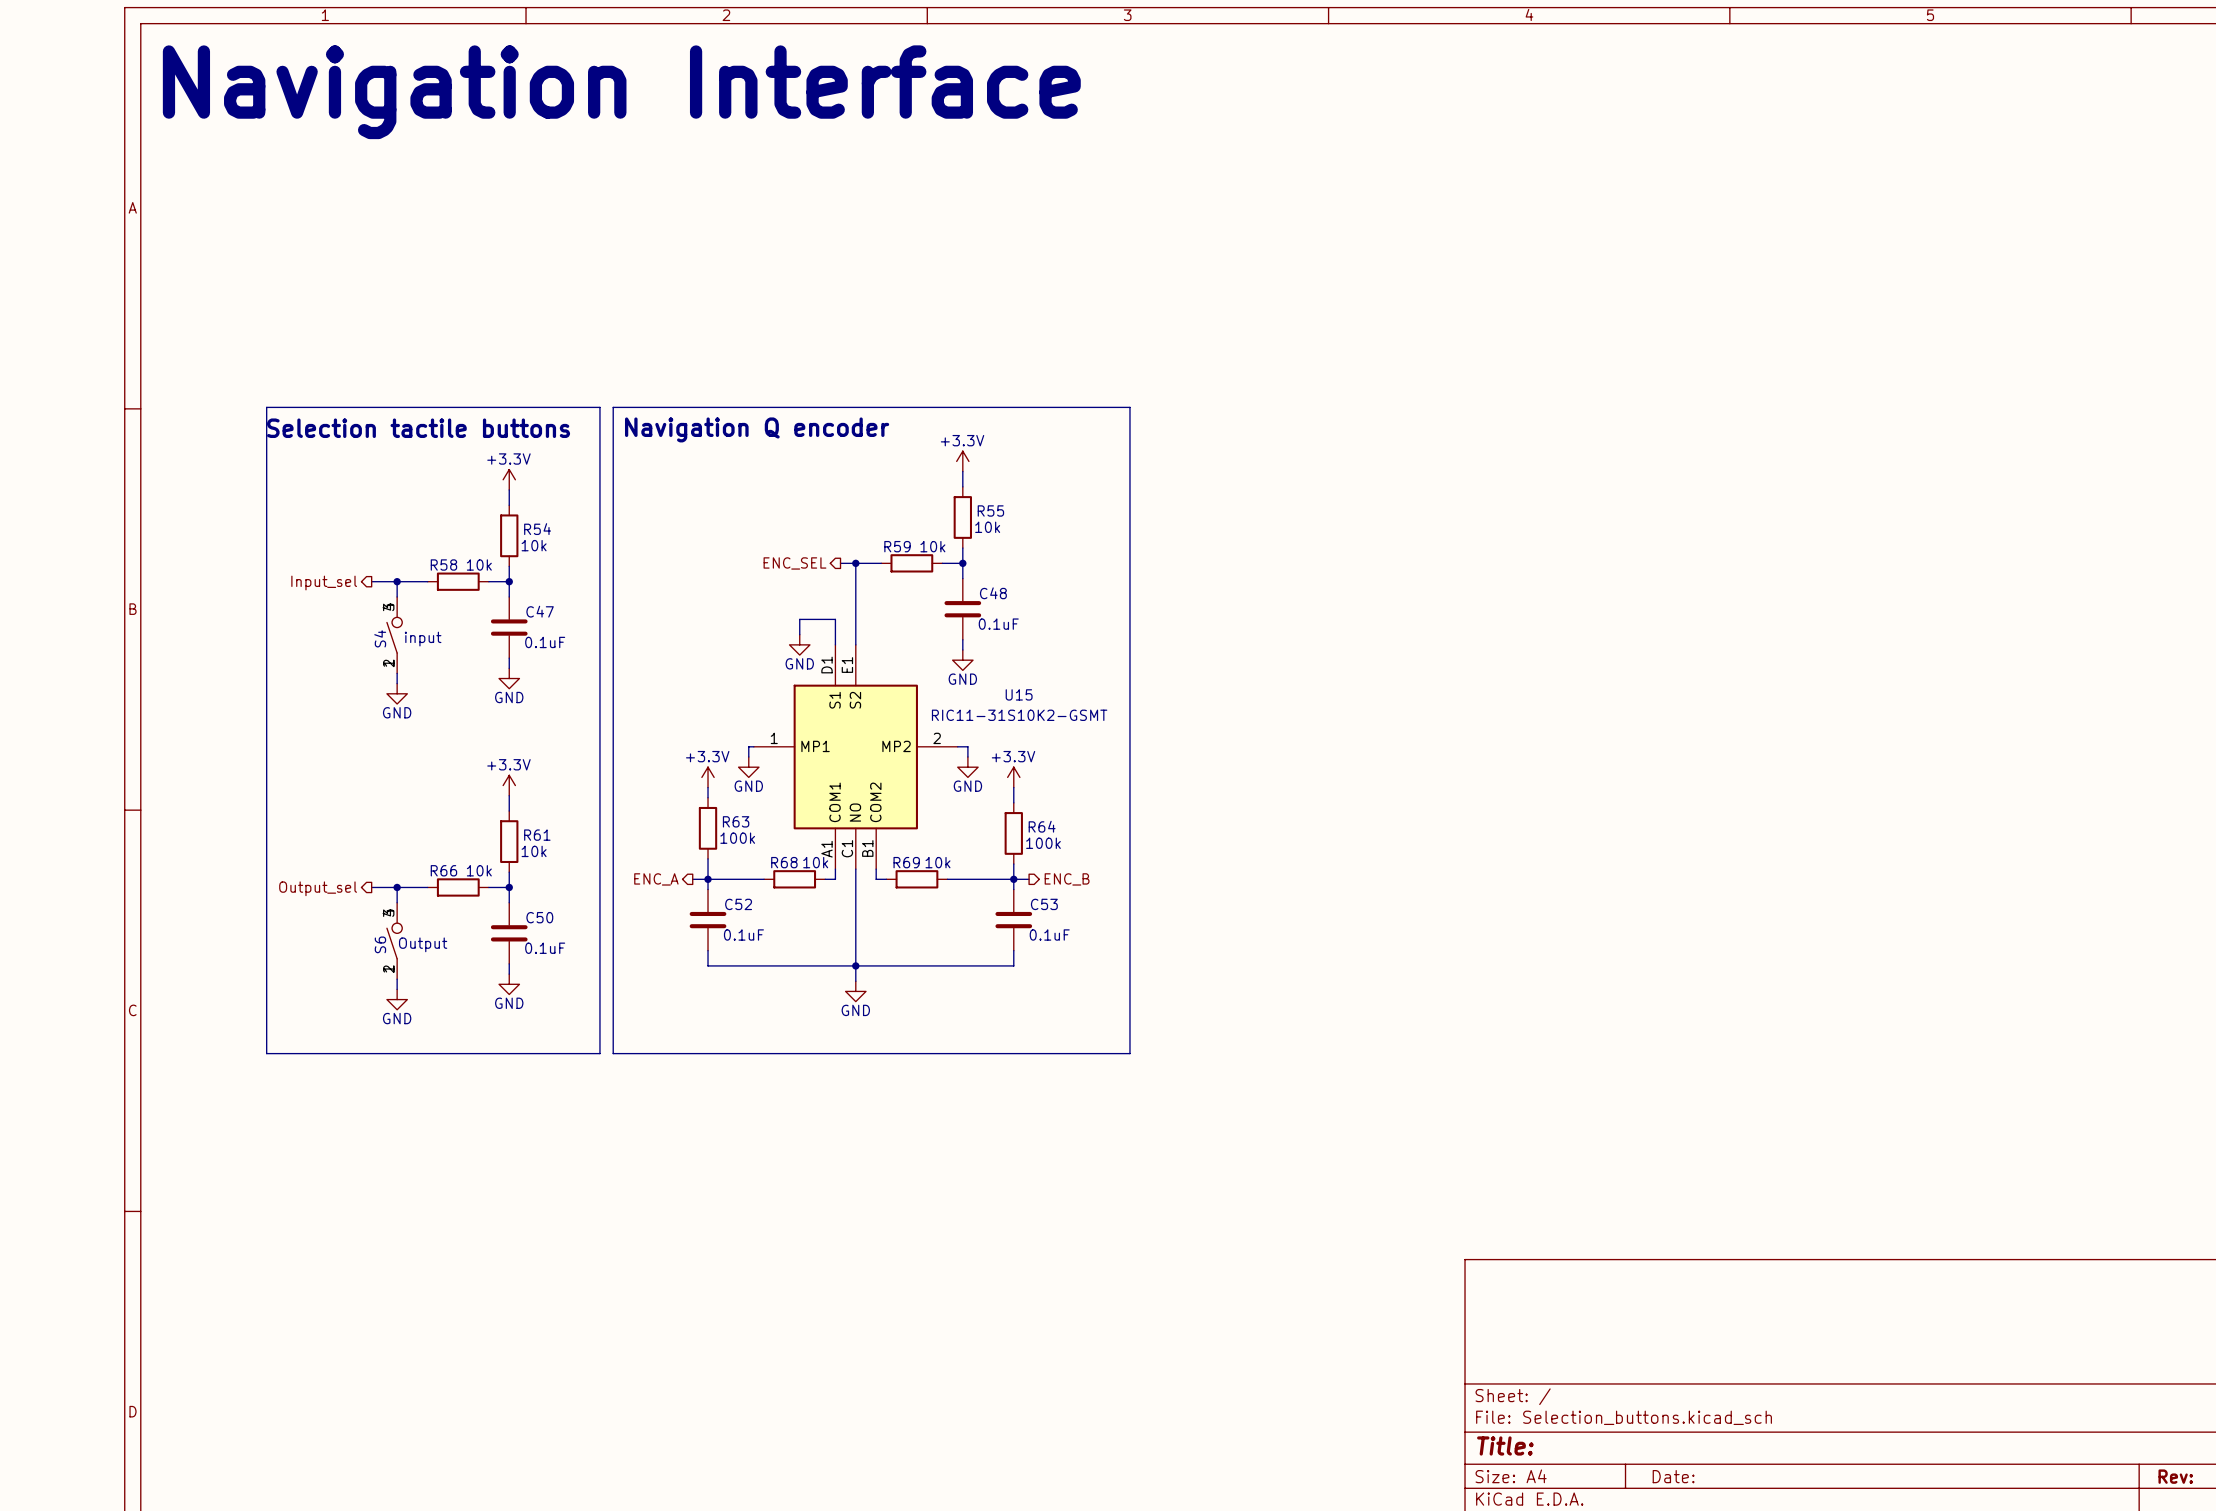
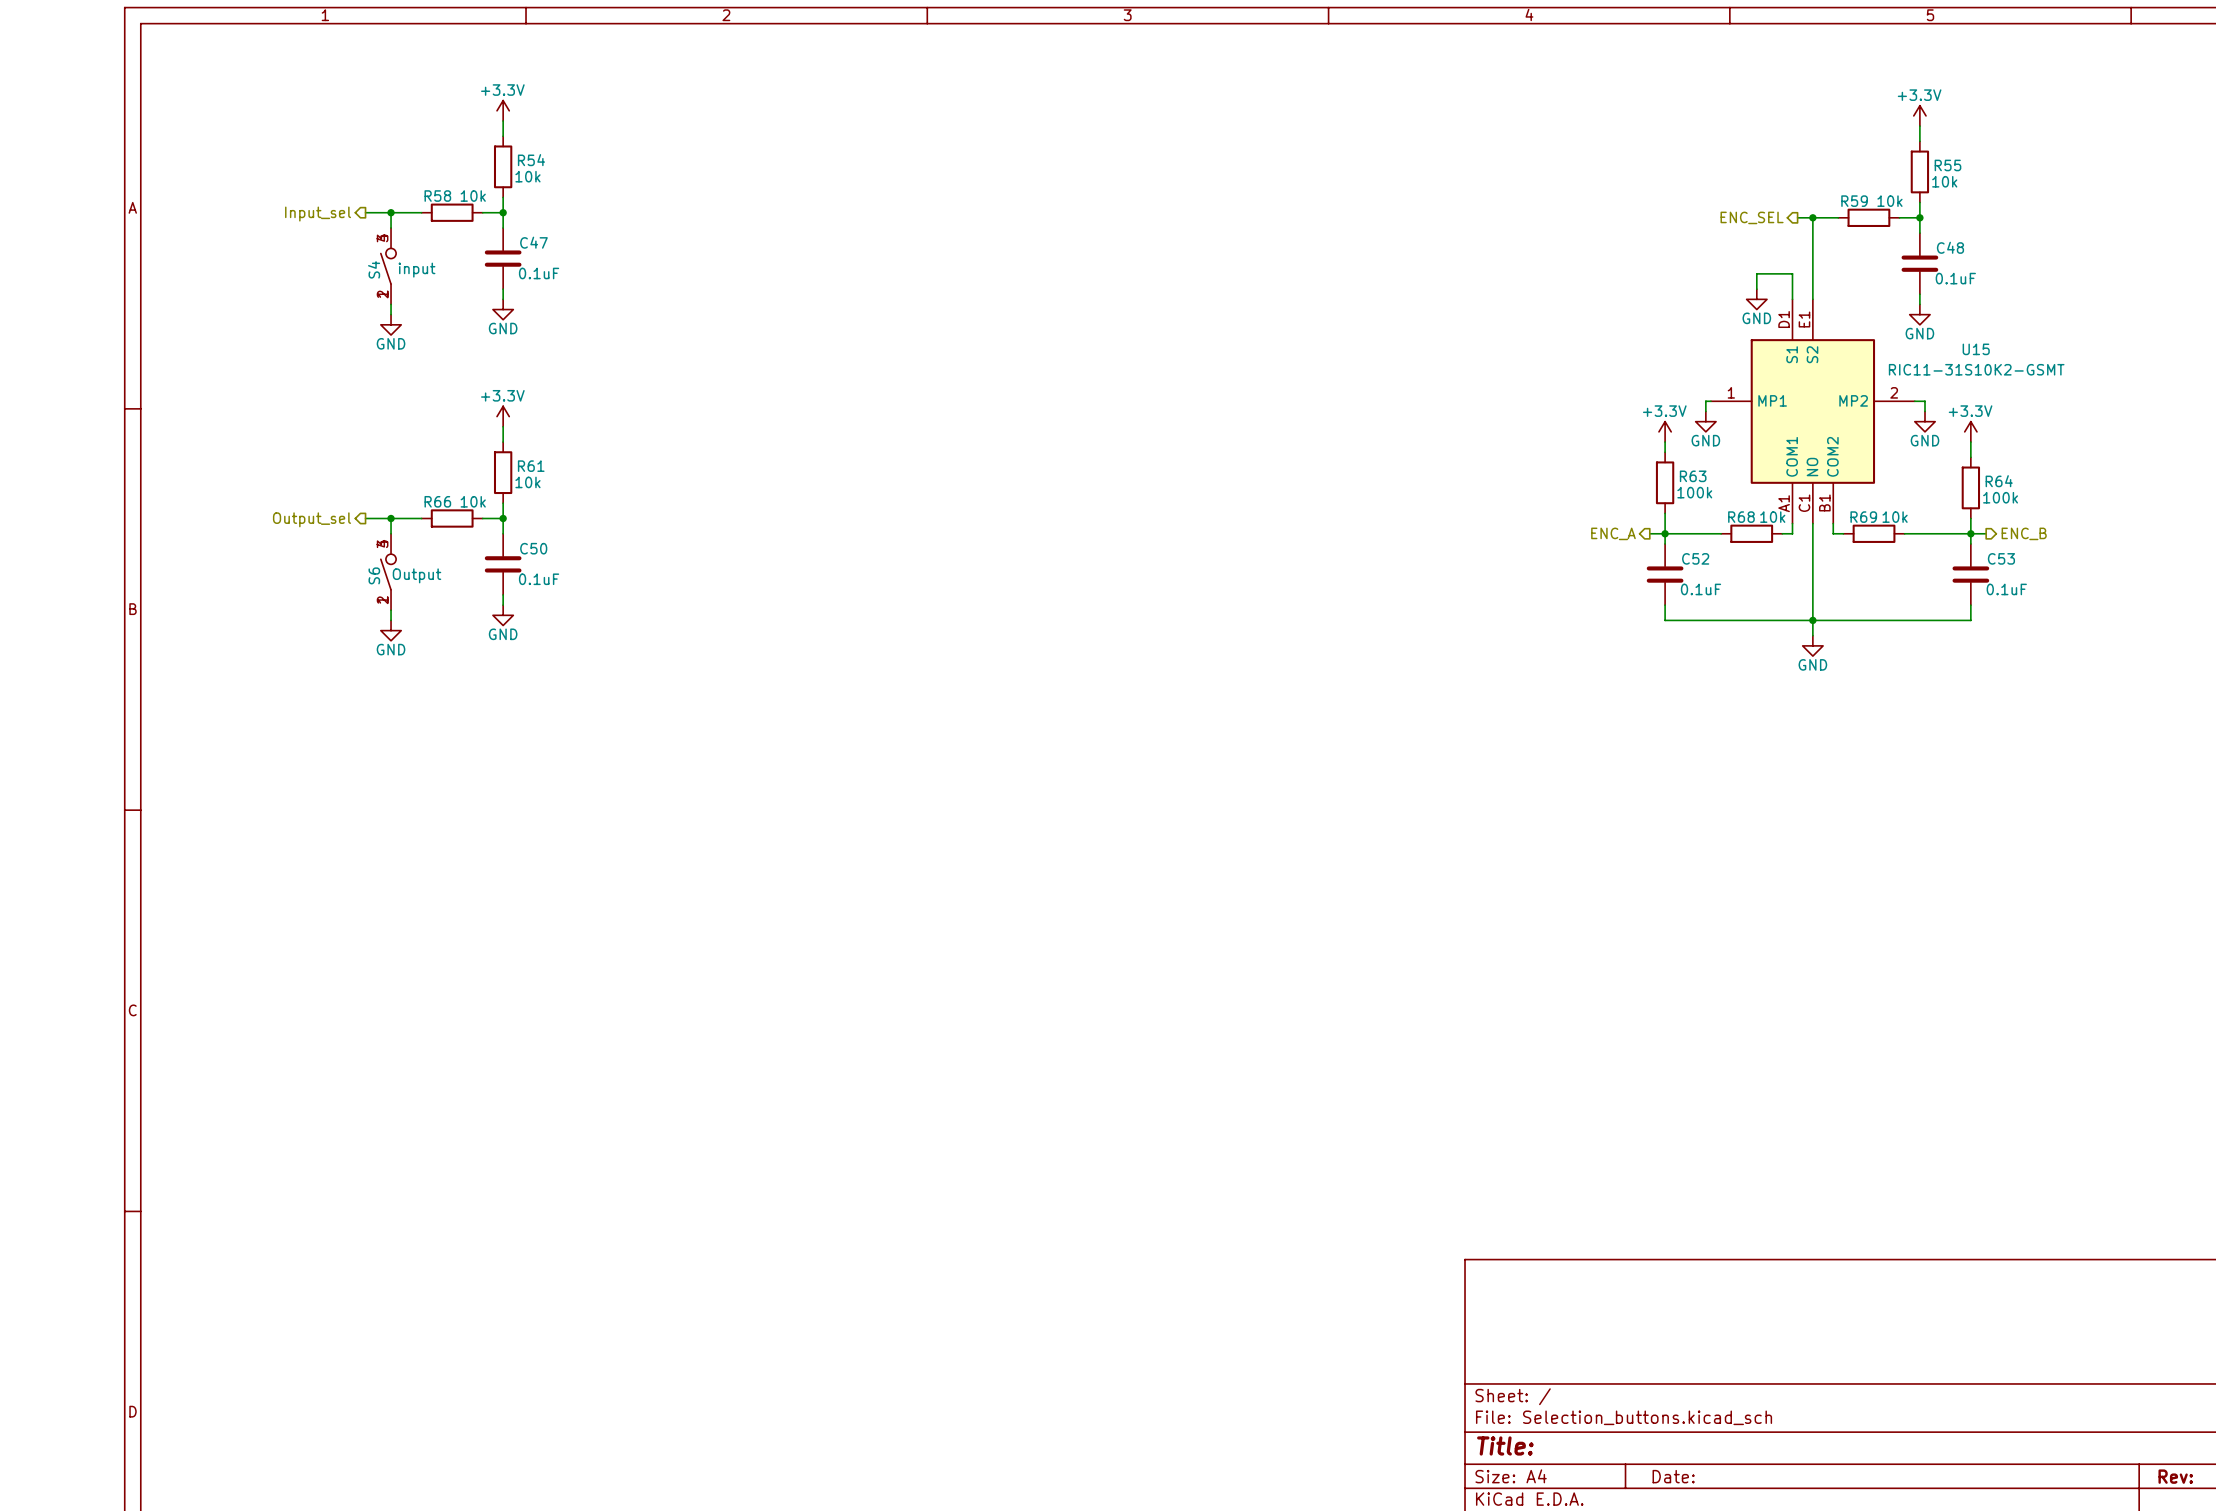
text: Navigation Interface (621, 92) -> none
power symbol: none -> +3.3V (503, 110)
power symbol: none -> +3.3V (1919, 115)
wire: none -> (503, 120) (503, 136)
wire: none -> (1919, 126) (1919, 141)
wire: none -> (503, 197) (503, 228)
wire: none -> (1919, 202) (1919, 233)
wire: none -> (365, 212) (421, 212)
wire: none -> (391, 212) (391, 228)
junction: none -> (391, 212)
wire: none -> (482, 212) (503, 212)
junction: none -> (503, 212)
hierarchical label: none -> Input_sel (318, 214)
hierarchical label: none -> ENC_SEL (1752, 217)
wire: none -> (1797, 217) (1838, 217)
wire: none -> (1812, 217) (1812, 299)
junction: none -> (1812, 217)
wire: none -> (1899, 217) (1919, 217)
junction: none -> (1919, 217)
wire: none -> (503, 289) (503, 299)
wire: none -> (1756, 289) (1756, 273) (1792, 273) (1792, 299)
wire: none -> (1919, 294) (1919, 304)
power symbol: none -> GND (1756, 299)
wire: none -> (391, 304) (391, 314)
power symbol: none -> GND (503, 309)
power symbol: none -> GND (1919, 314)
power symbol: none -> GND (391, 324)
wire: none -> (1710, 401) (1705, 401) (1705, 411)
wire: none -> (1914, 401) (1924, 401) (1924, 411)
line: (266, 407) (599, 407) (599, 1053) (266, 1053) (266, 407) -> none
line: (613, 407) (1129, 407) (1129, 1053) (613, 1053) (613, 407) -> none
power symbol: none -> GND (1705, 421)
power symbol: none -> GND (1924, 421)
text: Selection tactile buttons (418, 428) -> none
text: Navigation Q encoder (757, 429) -> none
power symbol: none -> +3.3V (1665, 431)
power symbol: none -> +3.3V (1970, 431)
wire: none -> (1665, 442) (1665, 452)
wire: none -> (1970, 442) (1970, 457)
power symbol: +3.3V (962, 461) -> none
wire: (962, 471) (962, 486) -> none
power symbol position: +3.3V (509, 479) -> +3.3V (503, 416)
wire: (509, 489) (509, 505) -> (503, 426) (503, 442)
wire: none -> (1665, 513) (1665, 543)
R55 position: (962, 517) -> (1919, 171)
junction: none -> (391, 518)
junction: none -> (503, 518)
wire: none -> (1970, 518) (1970, 543)
hierarchical label: none -> Output_sel (311, 519)
wire: none -> (1792, 523) (1792, 533) (1782, 533)
wire: none -> (1812, 523) (1812, 635)
wire: none -> (1833, 523) (1833, 533) (1843, 533)
hierarchical label: none -> ENC_A (1613, 533)
wire: none -> (1649, 533) (1721, 533)
junction: none -> (1665, 533)
wire: none -> (1904, 533) (1986, 533)
junction: none -> (1970, 533)
hierarchical label: none -> ENC_B (2024, 533)
R54 position: (509, 535) -> (503, 166)
wire: (962, 548) (962, 578) -> none
hierarchical label: ENC_SEL (794, 563) -> none
wire: (840, 563) (881, 563) -> none
wire: (855, 563) (855, 644) -> none
junction: (855, 563) -> none
R59 position: (911, 563) -> (1868, 217)
wire: (942, 563) (962, 563) -> none
junction: (962, 563) -> none
wire: (509, 566) (509, 596) -> (503, 503) (503, 533)
wire: (371, 581) (427, 581) -> (365, 518) (421, 518)
wire: (397, 581) (397, 596) -> (391, 518) (391, 533)
junction: (397, 581) -> none
R58 position: (458, 581) -> (452, 212)
wire: (488, 581) (509, 581) -> (482, 518) (503, 518)
junction: (509, 581) -> none
hierarchical label: Input_sel (324, 583) -> none
wire: none -> (1665, 605) (1665, 620) (1970, 620) (1970, 605)
C48 position: (962, 609) -> (1919, 263)
junction: none -> (1812, 620)
C47 position: (509, 627) -> (503, 258)
wire: (799, 634) (799, 619) (835, 619) (835, 644) -> none
S4 position: (394, 635) -> (388, 266)
wire: (962, 639) (962, 649) -> none
power symbol: GND (799, 644) -> none
power symbol: none -> GND (1812, 645)
wire: (509, 658) (509, 668) -> (503, 594) (503, 605)
power symbol: GND (962, 660) -> none
wire: (397, 673) (397, 683) -> (391, 610) (391, 620)
power symbol position: GND (509, 678) -> GND (503, 615)
power symbol position: GND (397, 693) -> GND (391, 630)
wire: (753, 746) (748, 746) (748, 757) -> none
wire: (957, 746) (967, 746) (967, 757) -> none
U15 position: (855, 757) -> (1812, 411)
power symbol: GND (748, 767) -> none
power symbol: GND (967, 767) -> none
power symbol: +3.3V (708, 777) -> none
power symbol: +3.3V (1013, 777) -> none
power symbol: +3.3V (509, 785) -> none
wire: (708, 787) (708, 797) -> none
wire: (1013, 787) (1013, 802) -> none
wire: (509, 795) (509, 811) -> none
R63 position: (708, 828) -> (1665, 482)
R64 position: (1013, 833) -> (1970, 487)
R61 position: (509, 841) -> (503, 472)
wire: (708, 858) (708, 889) -> none
wire: (1013, 864) (1013, 889) -> none
wire: (835, 869) (835, 879) (825, 879) -> none
wire: (855, 869) (855, 981) -> none
wire: (876, 869) (876, 879) (886, 879) -> none
wire: (509, 872) (509, 902) -> none
hierarchical label: ENC_A (656, 879) -> none
wire: (692, 879) (764, 879) -> none
junction: (708, 879) -> none
R68 position: (794, 879) -> (1751, 533)
R69 position: (916, 879) -> (1874, 533)
wire: (947, 879) (1029, 879) -> none
junction: (1013, 879) -> none
hierarchical label: ENC_B (1067, 879) -> none
wire: (371, 887) (427, 887) -> none
wire: (397, 887) (397, 902) -> none
junction: (397, 887) -> none
R66 position: (458, 887) -> (452, 518)
wire: (488, 887) (509, 887) -> none
junction: (509, 887) -> none
hierarchical label: Output_sel (318, 888) -> none
C52 position: (708, 920) -> (1665, 574)
C53 position: (1013, 920) -> (1970, 574)
C50 position: (509, 933) -> (503, 564)
S6 position: (394, 940) -> (388, 572)
wire: (708, 950) (708, 965) (1013, 965) (1013, 950) -> none
wire: (509, 963) (509, 974) -> none
junction: (855, 965) -> none
wire: (397, 979) (397, 989) -> none
power symbol: GND (509, 984) -> none
power symbol: GND (855, 991) -> none
power symbol: GND (397, 999) -> none

